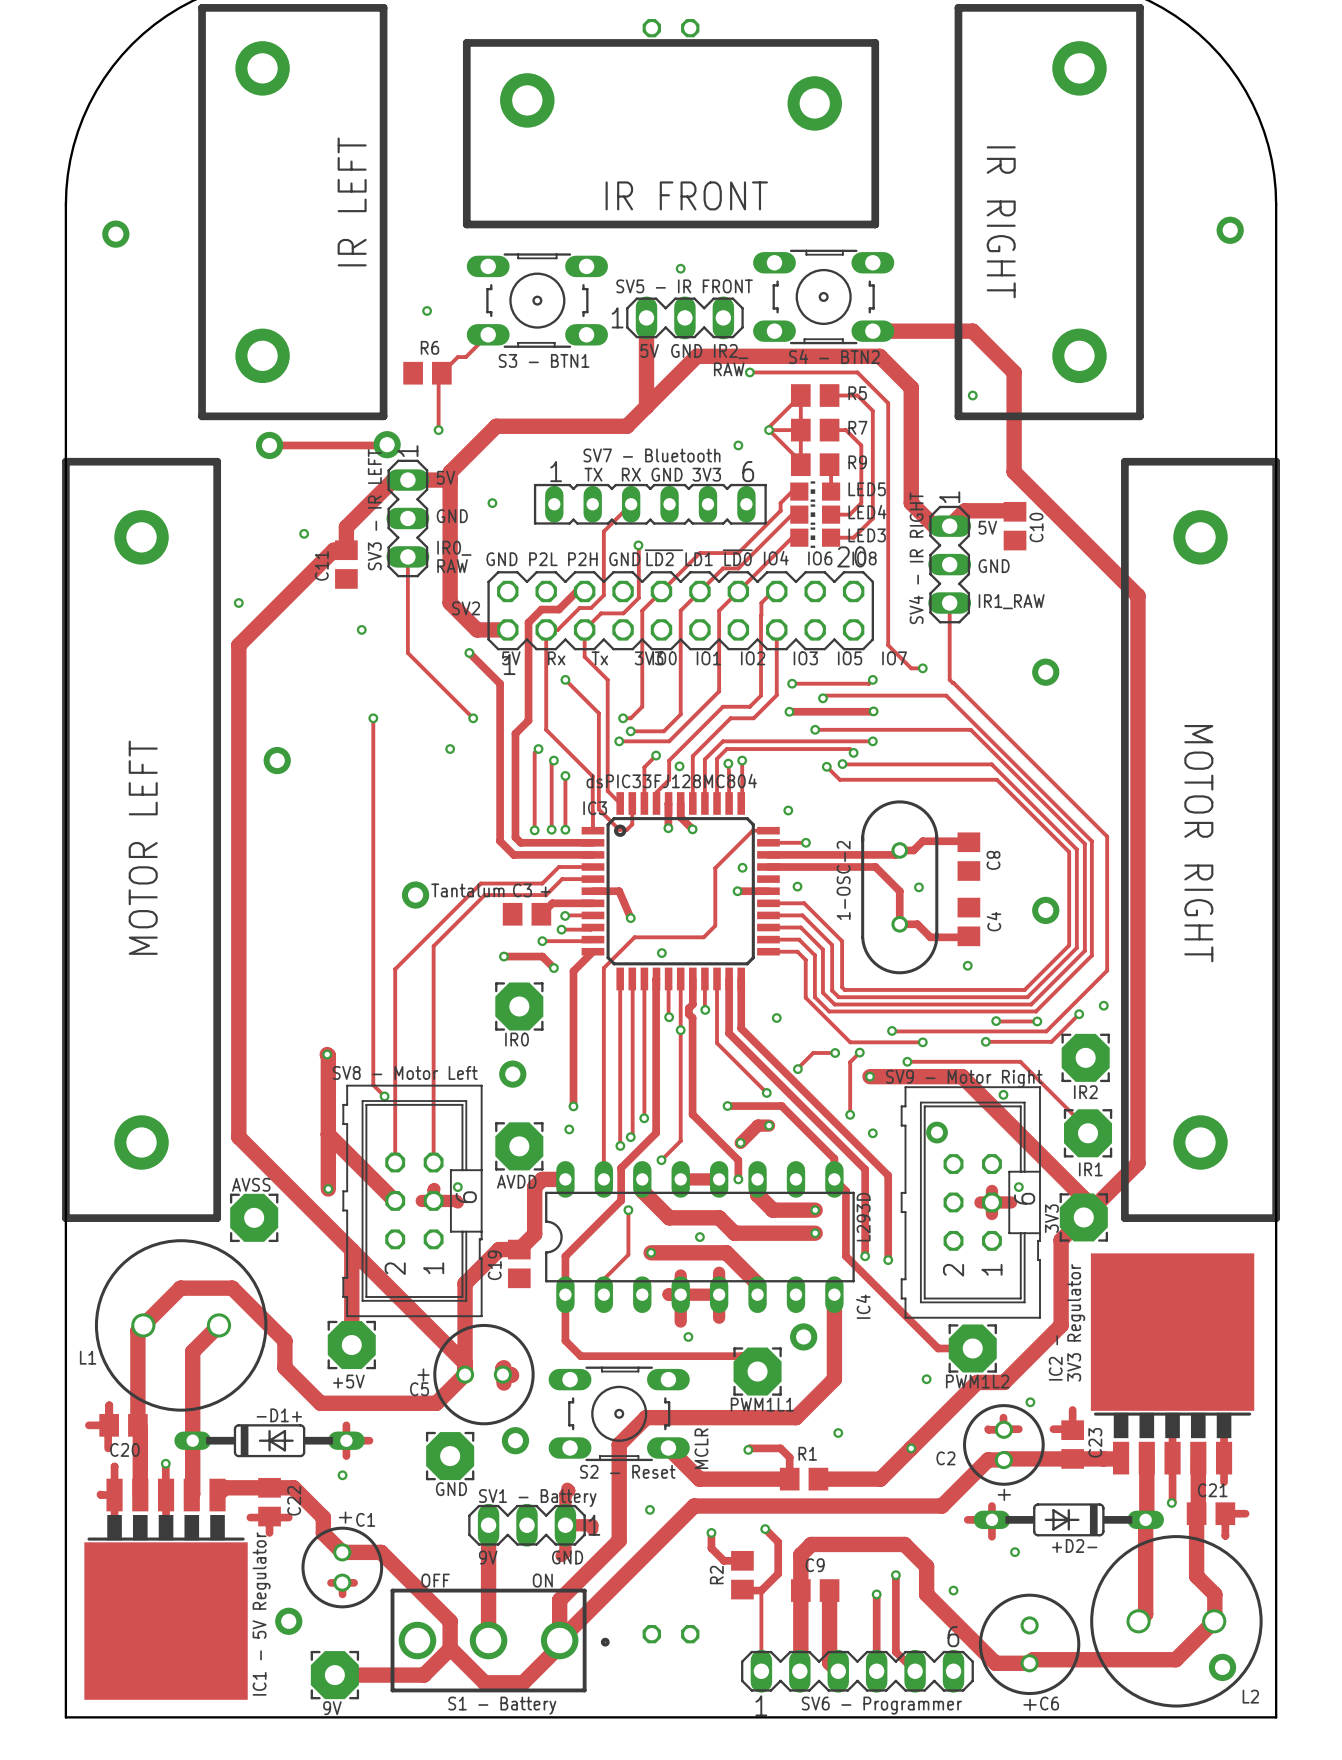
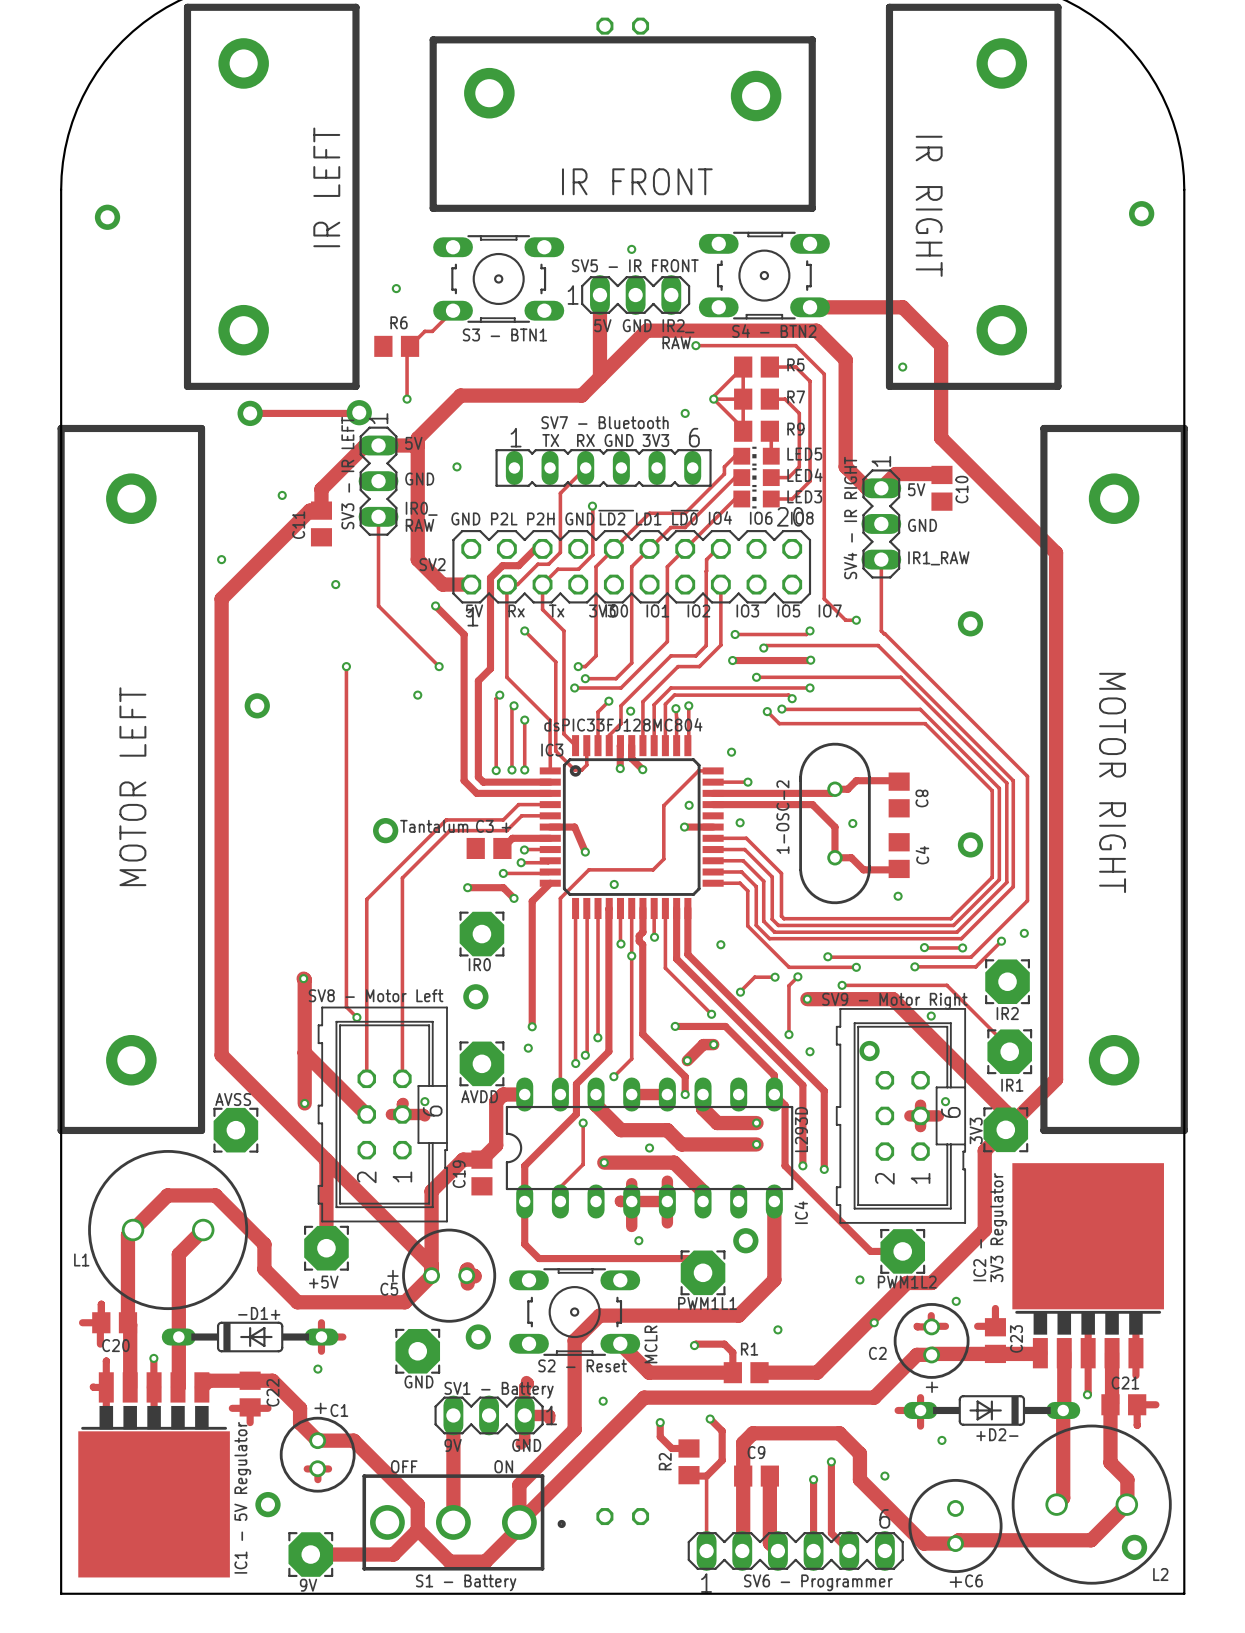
via position: (911, 1448) -> (874, 1322)

